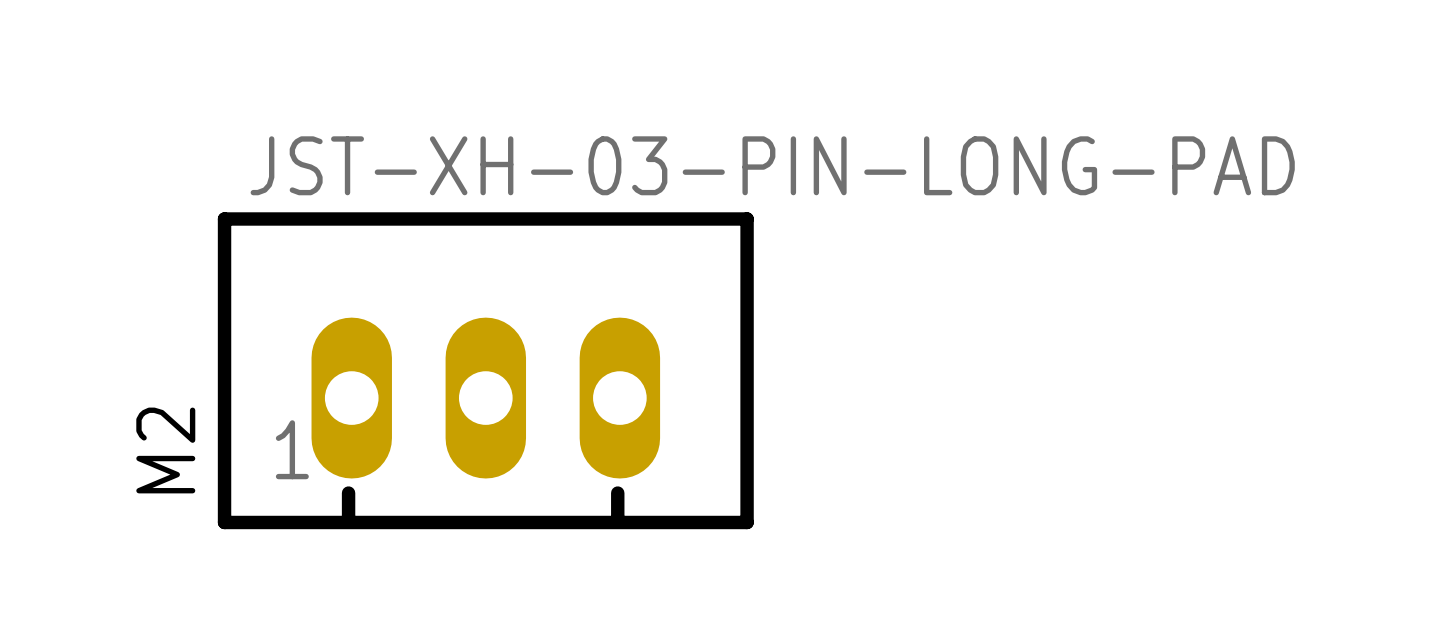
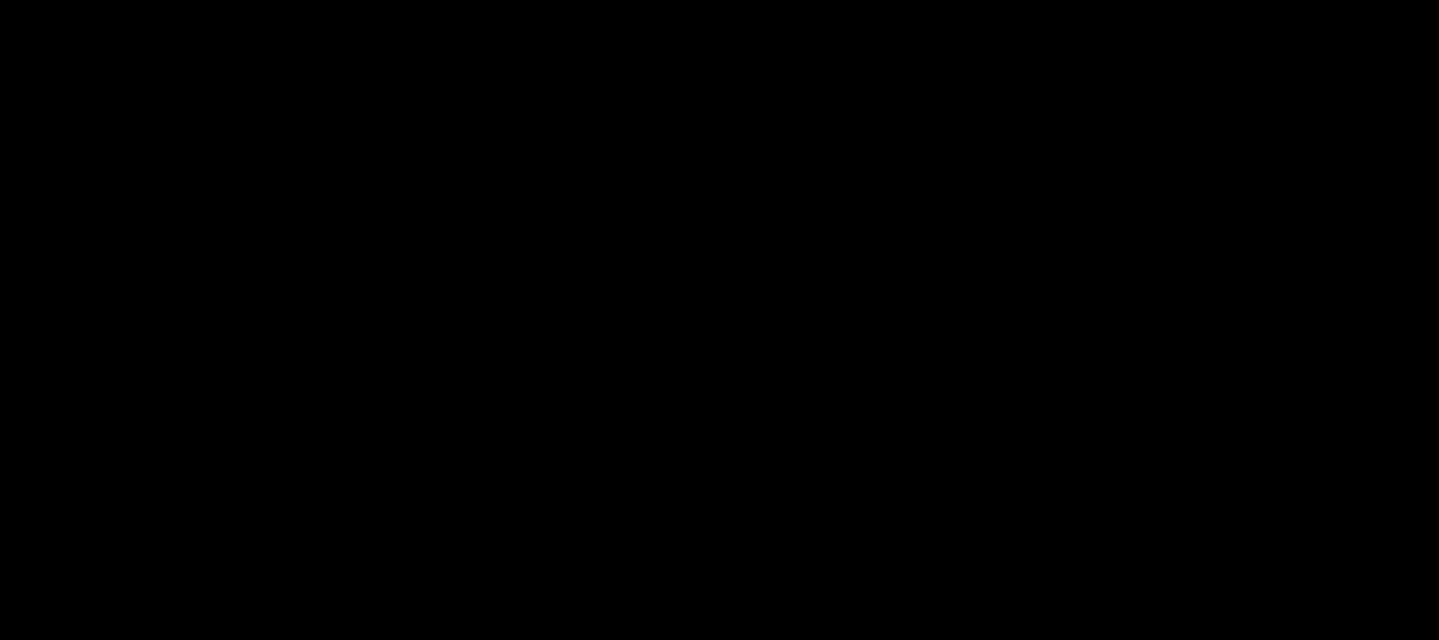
M2: JST-XH-03-PIN-LONG-PAD (485, 370) -> none

